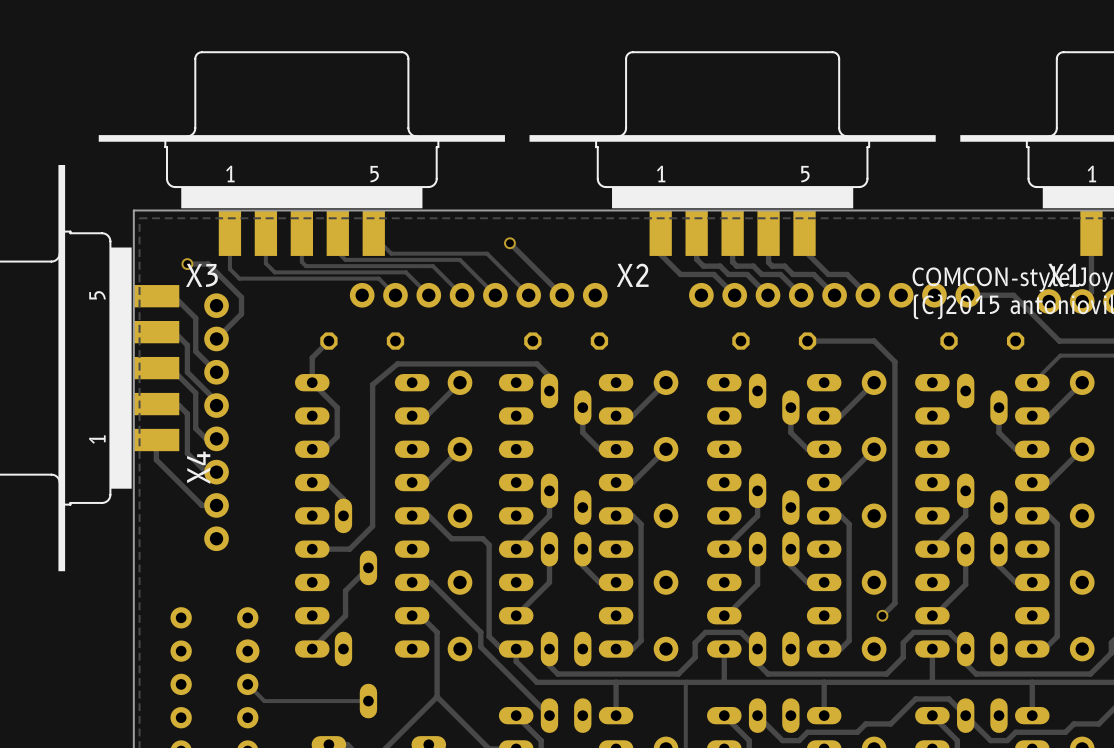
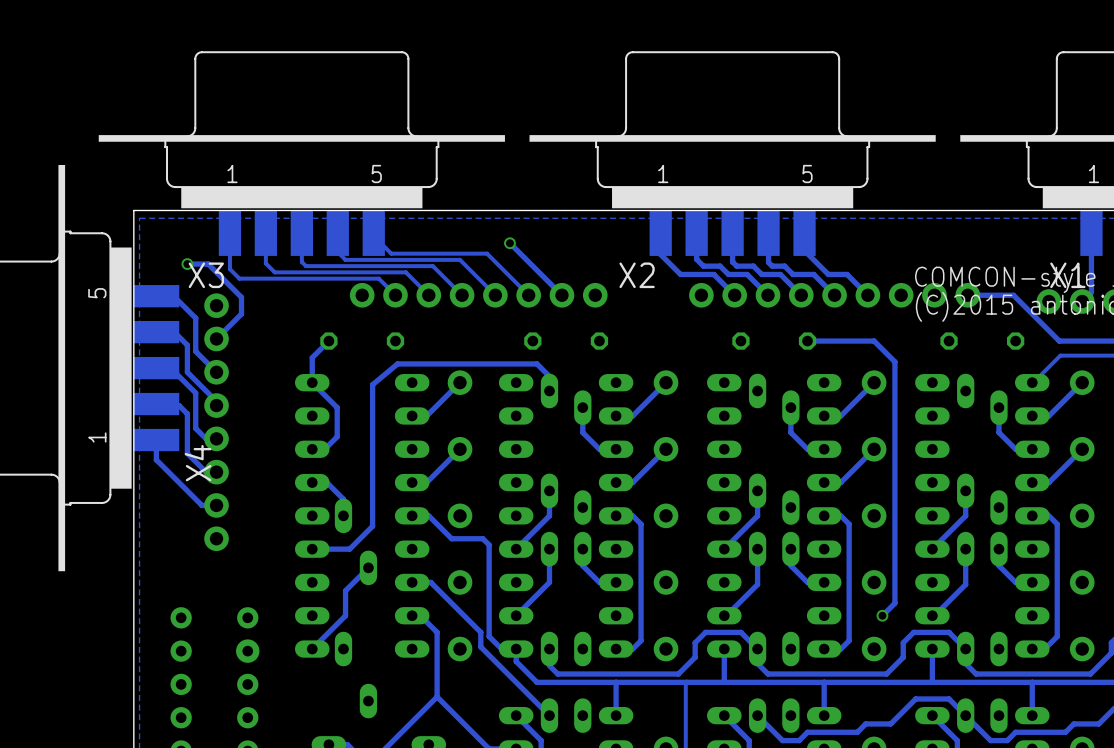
track: (247, 684) (264, 701) (368, 701) -> none

